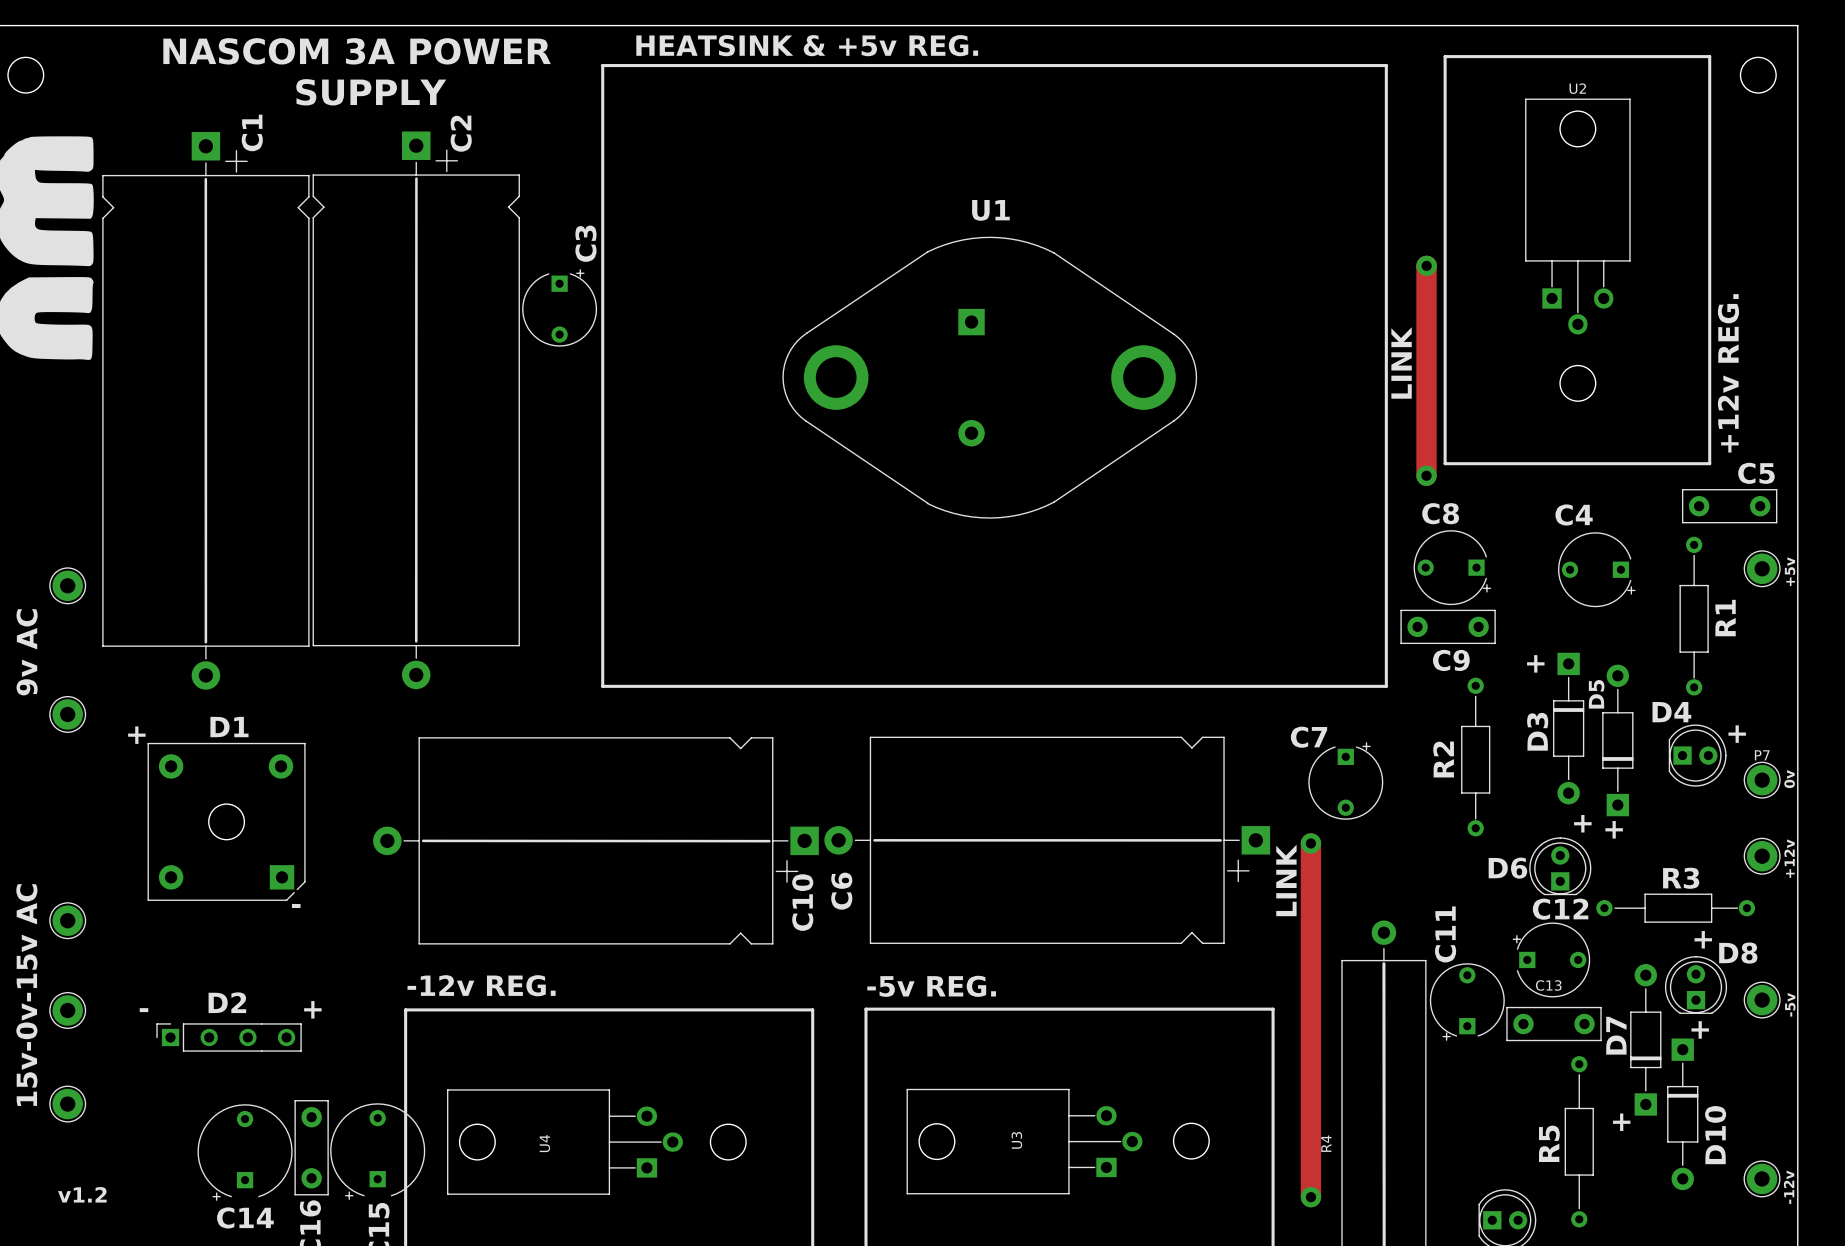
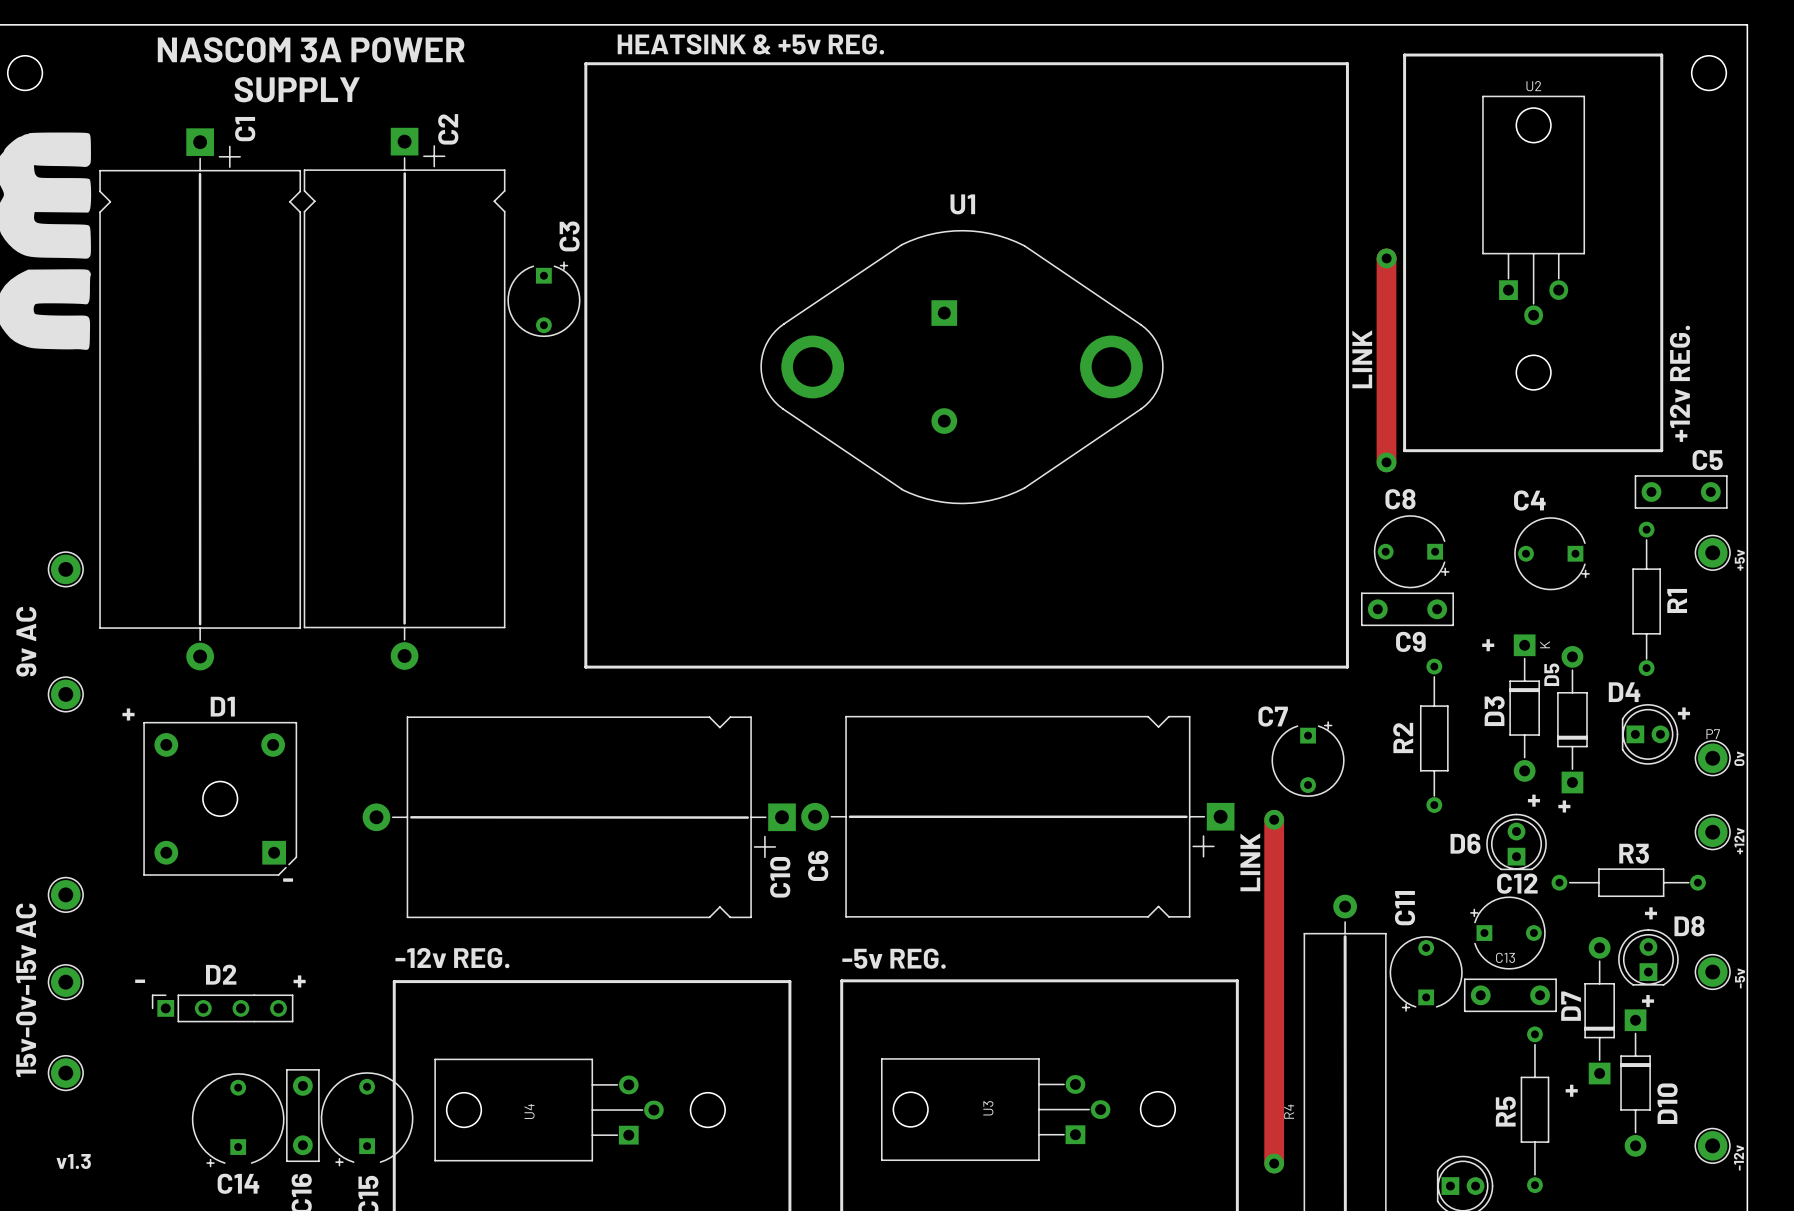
D3 text: none -> K (1545, 644)
text: v1.2 (82, 1194) -> v1.3 (73, 1161)

